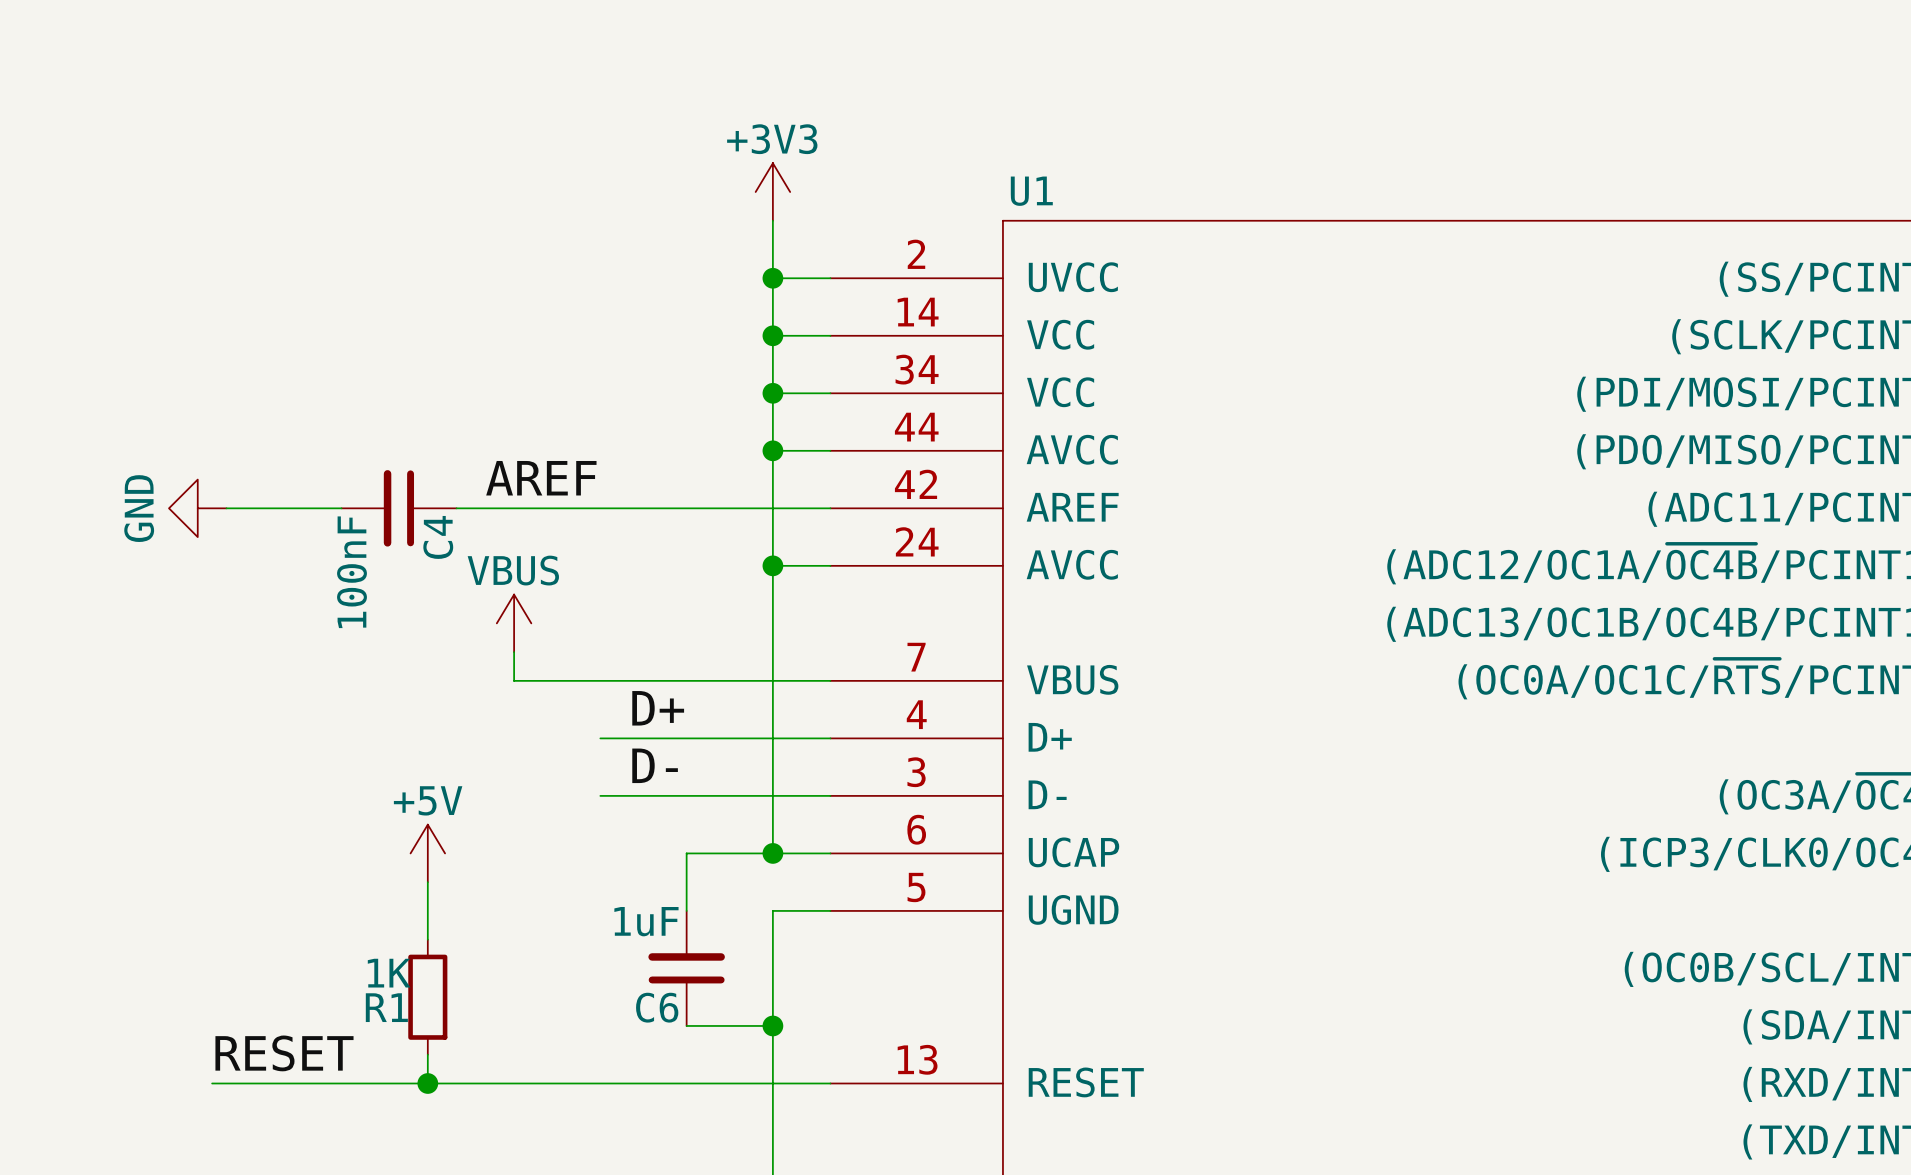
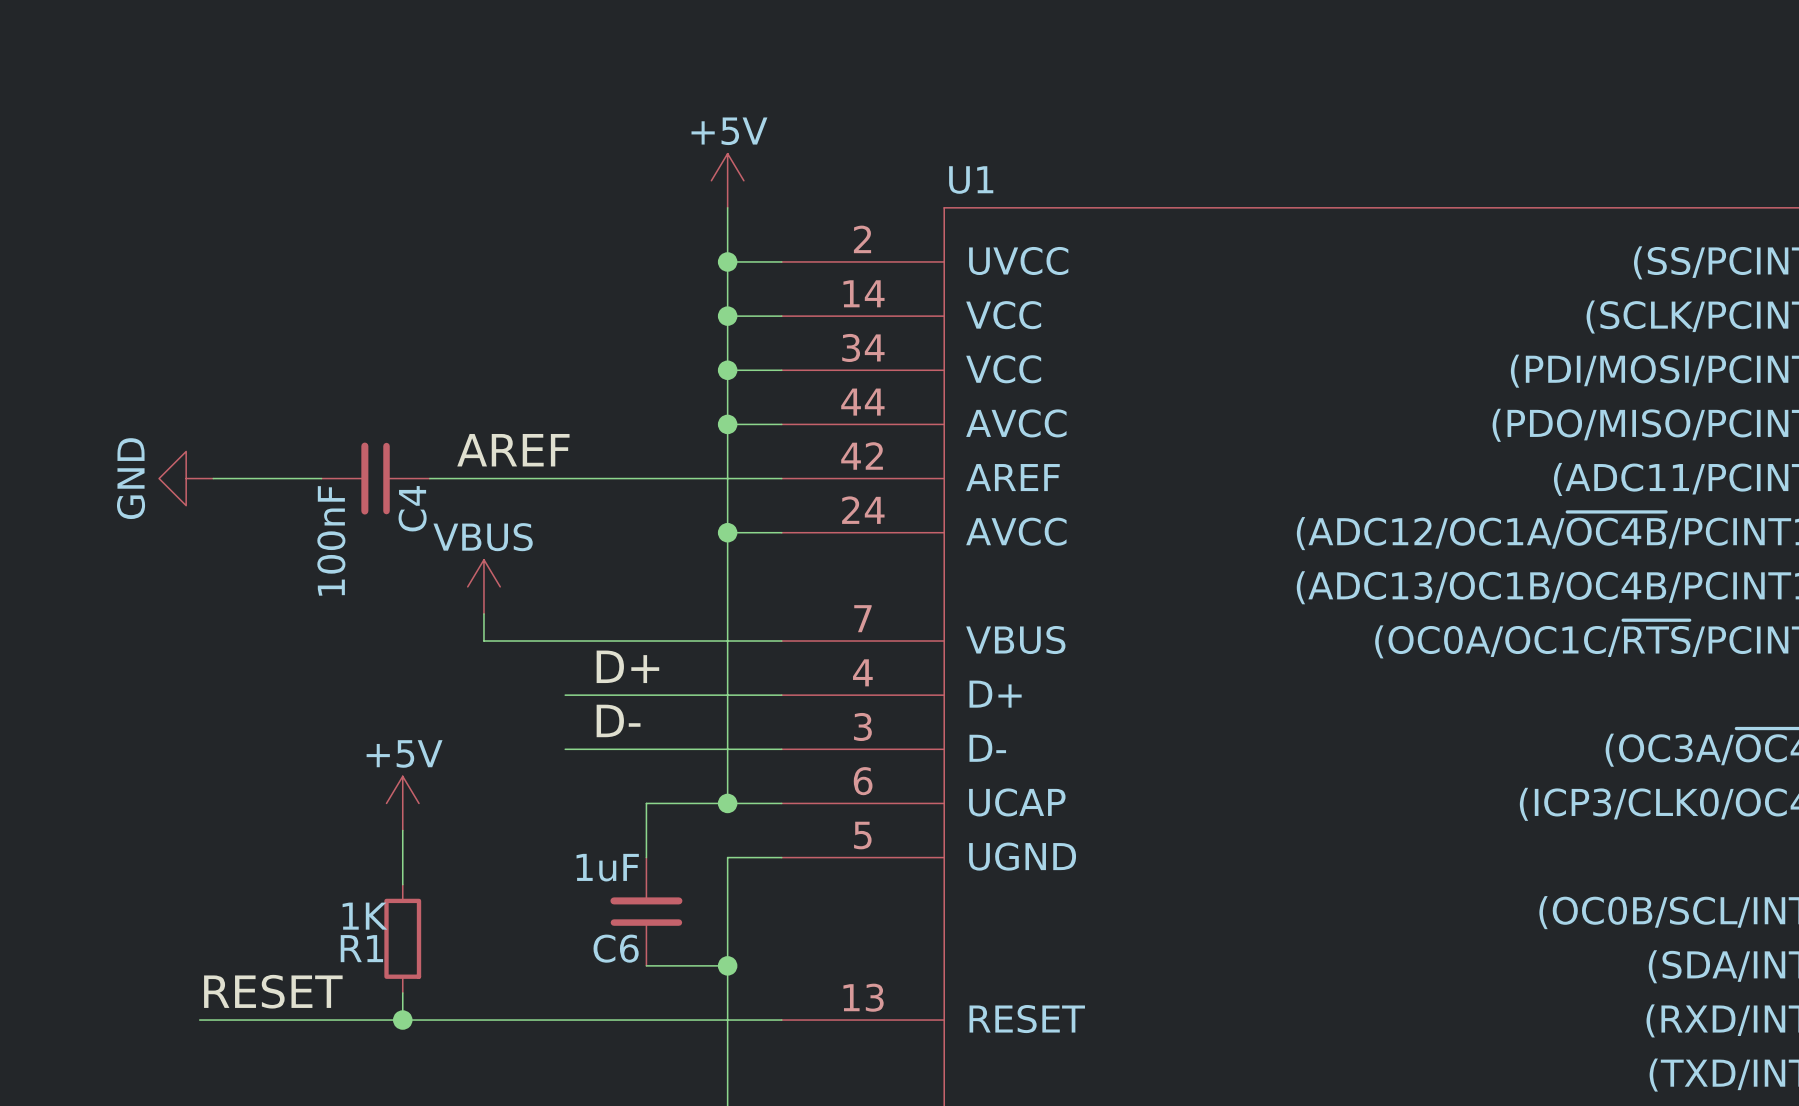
power symbol: +3V3 (772, 192) -> +5V (727, 180)

